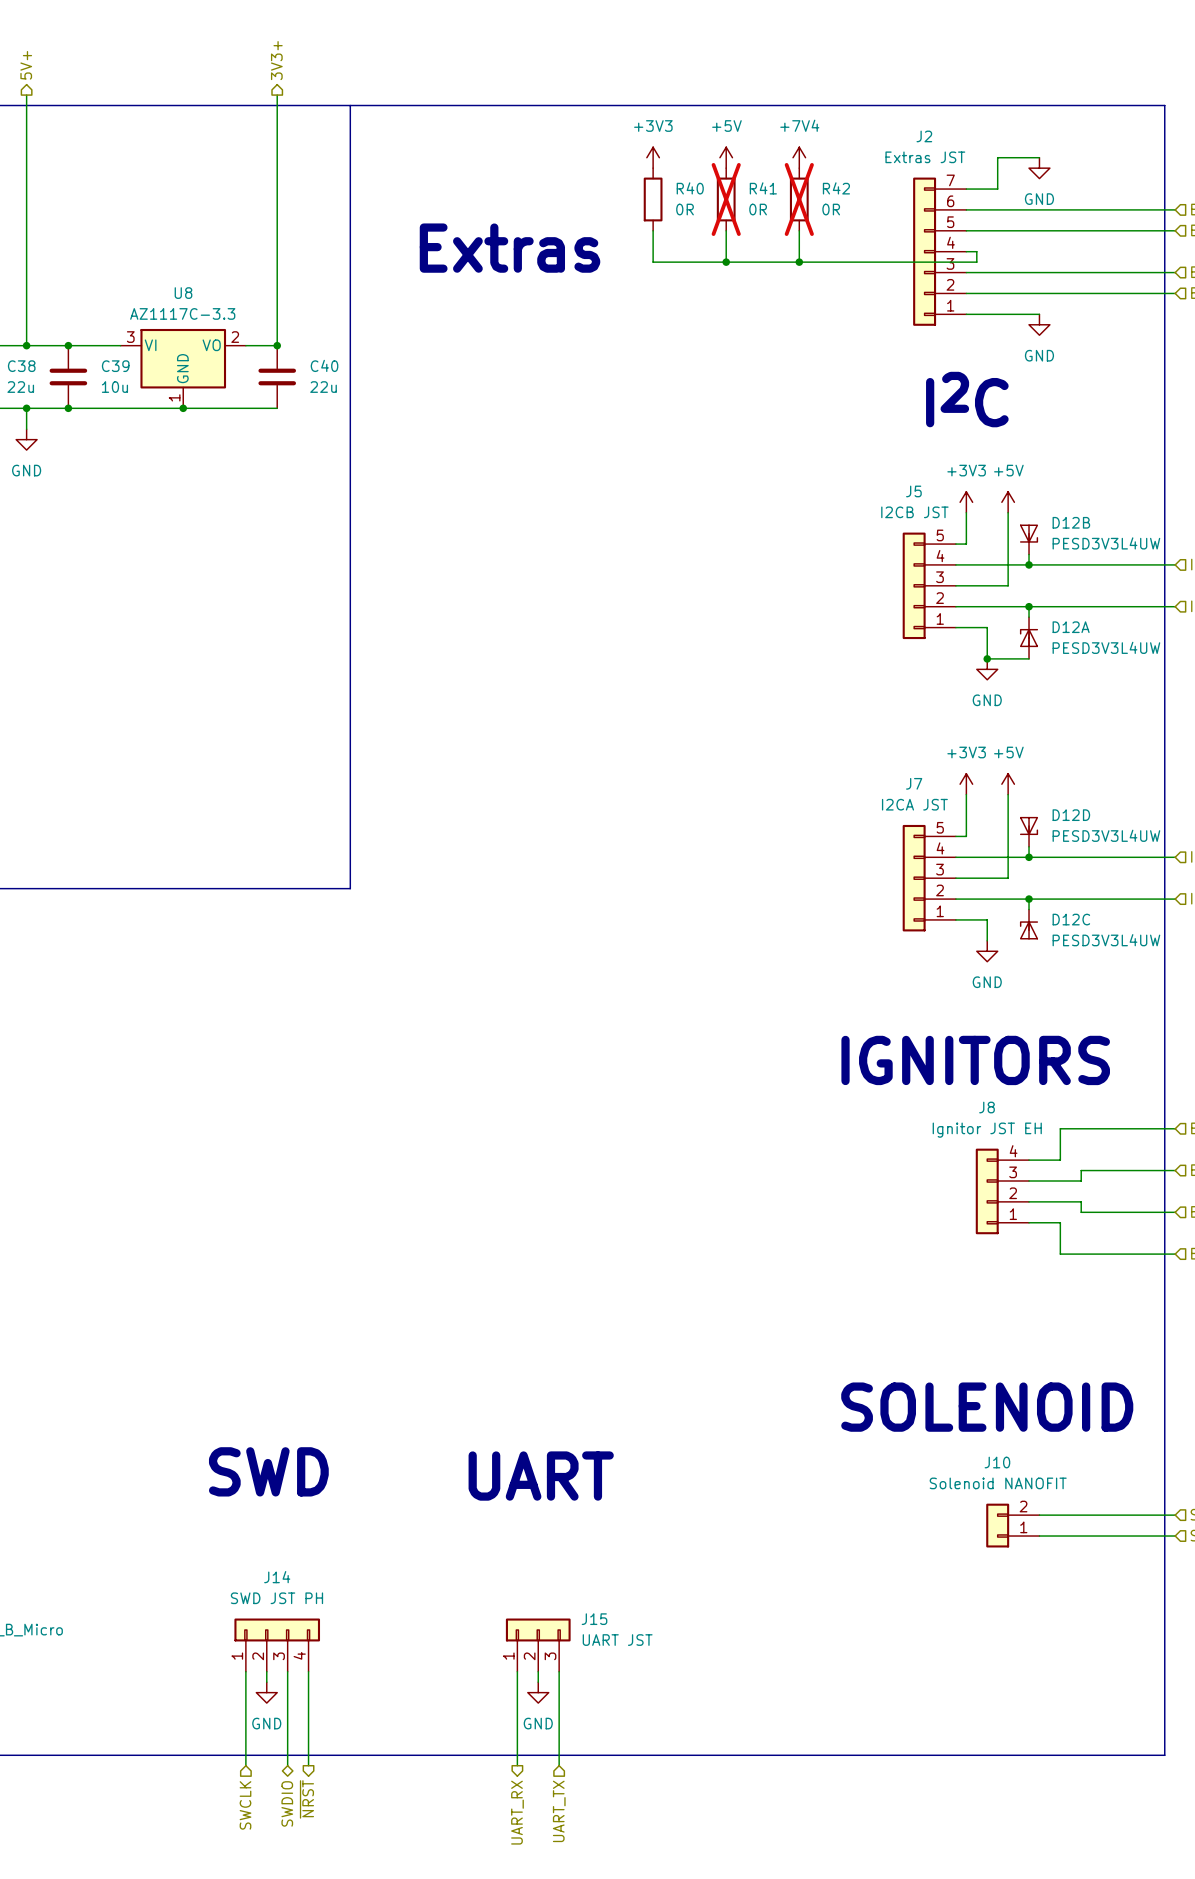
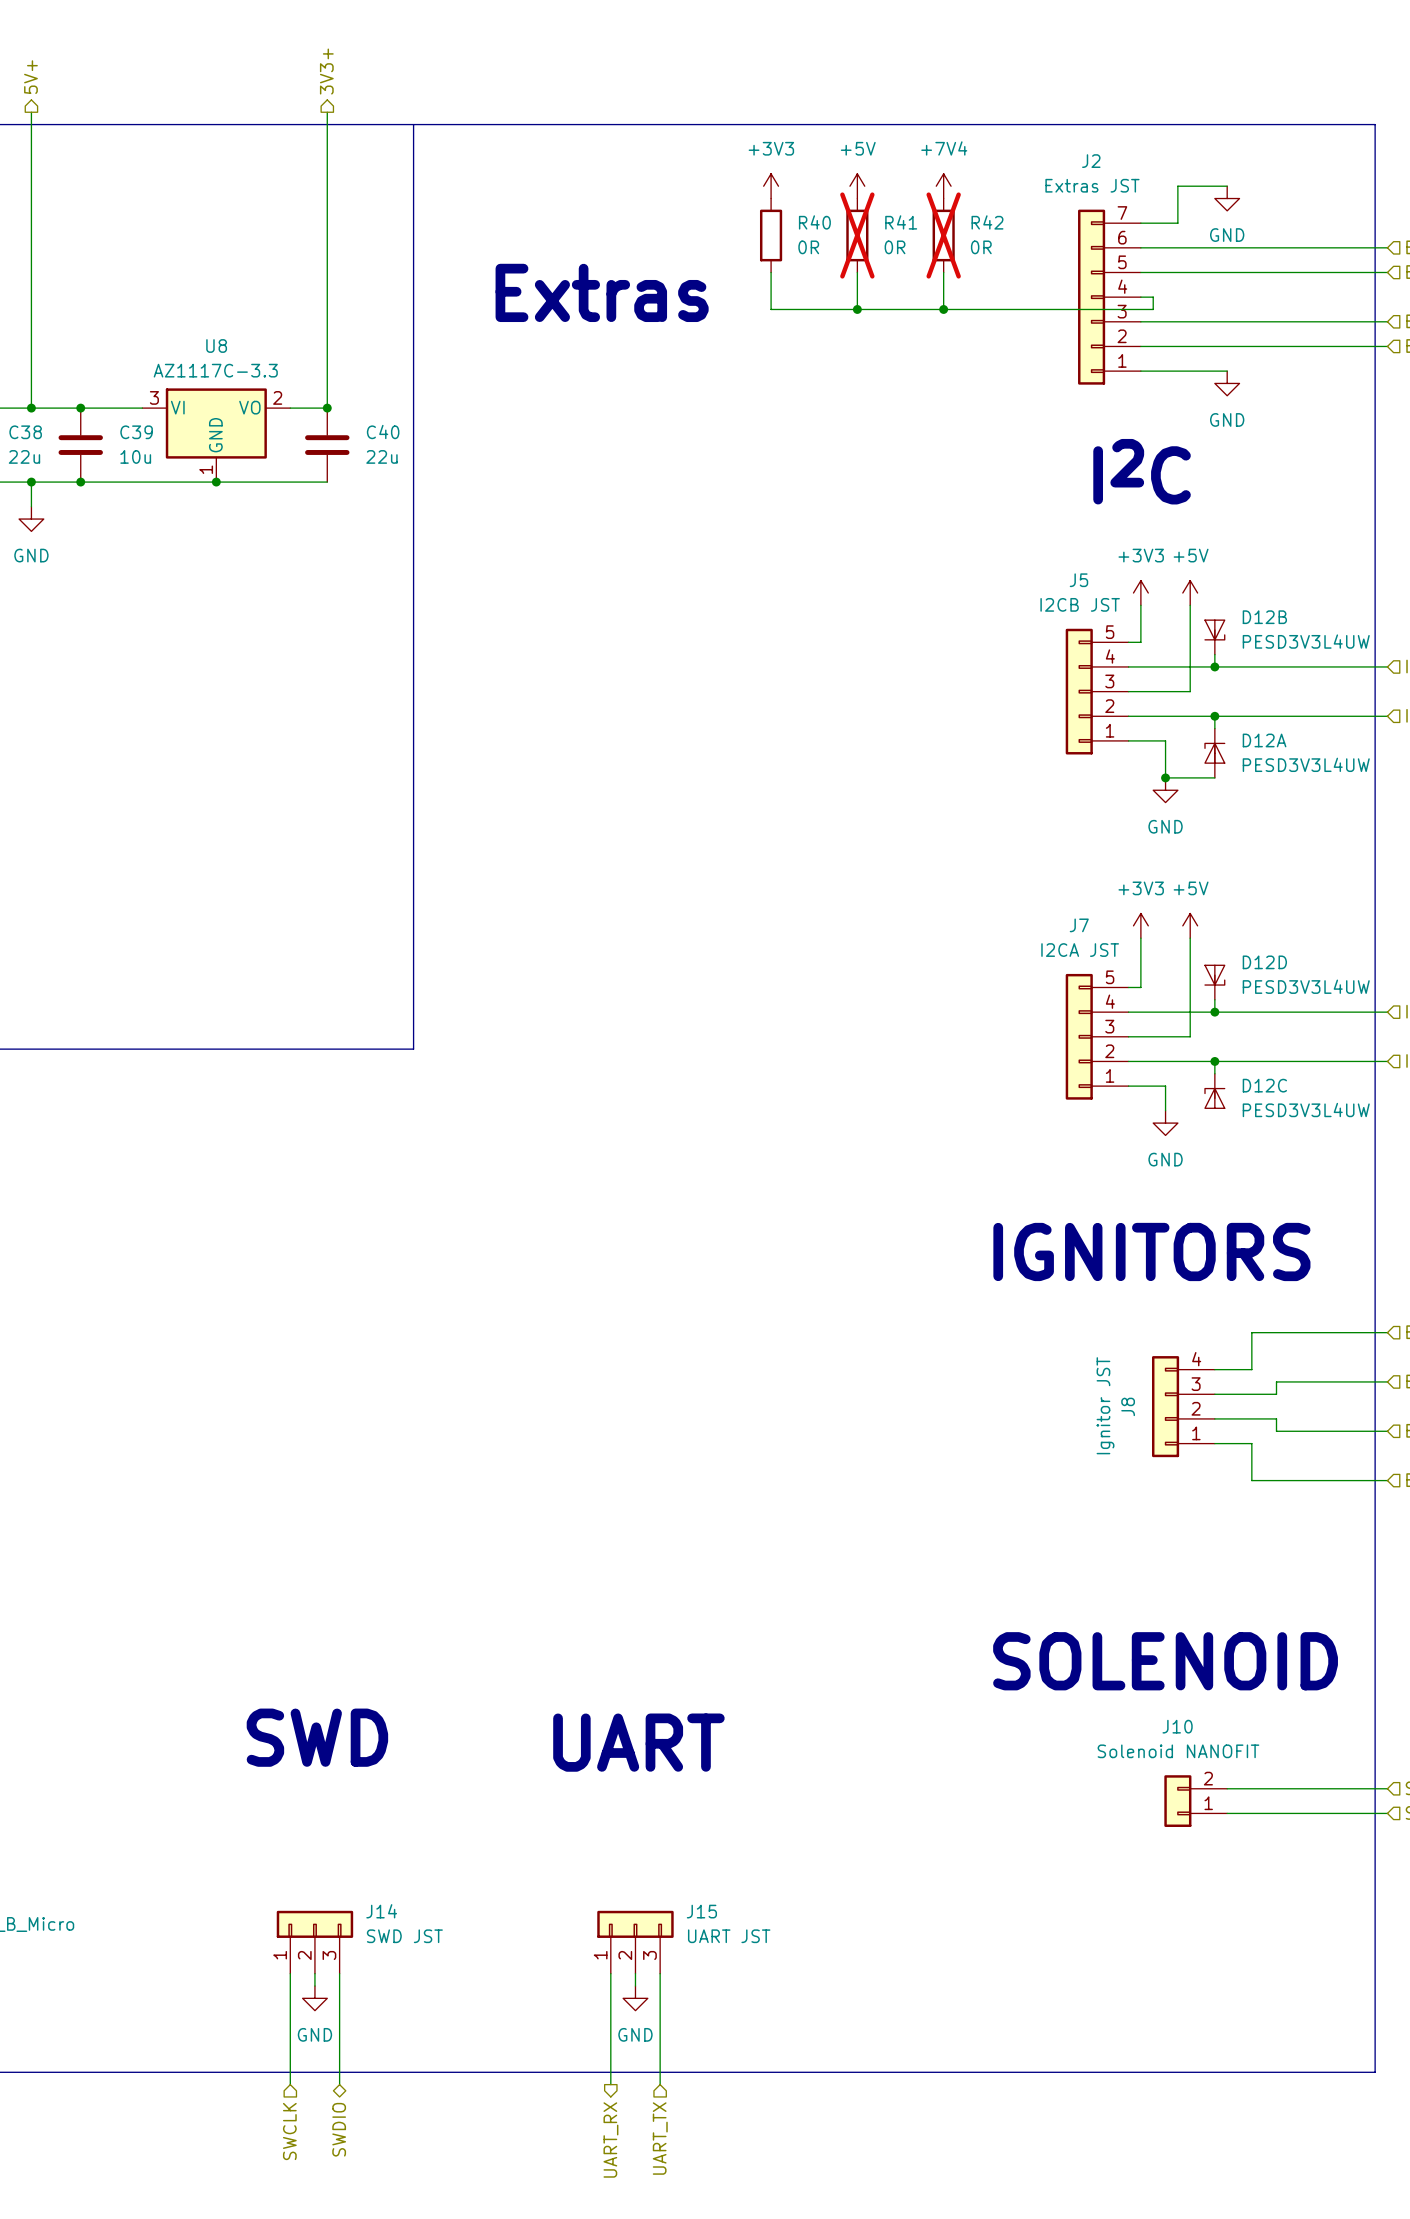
J8 name rotation: 0° (987, 1107) -> 90° counterclockwise (1128, 1406)
J8 name position: J8 (987, 1107) -> J8 (1128, 1406)
J8 value: Ignitor JST EH (987, 1130) -> Ignitor JST (1105, 1405)
J14 name position: J14 (277, 1577) -> J14 (381, 1911)
J14 value: SWD JST PH (276, 1598) -> SWD JST (404, 1936)
J14 symbol: [234, 1618, 321, 1672] -> [276, 1910, 354, 1974]
wire: (308, 1671) (308, 1765) -> none
hierarchical label: ~{NRST} (306, 1799) -> none

